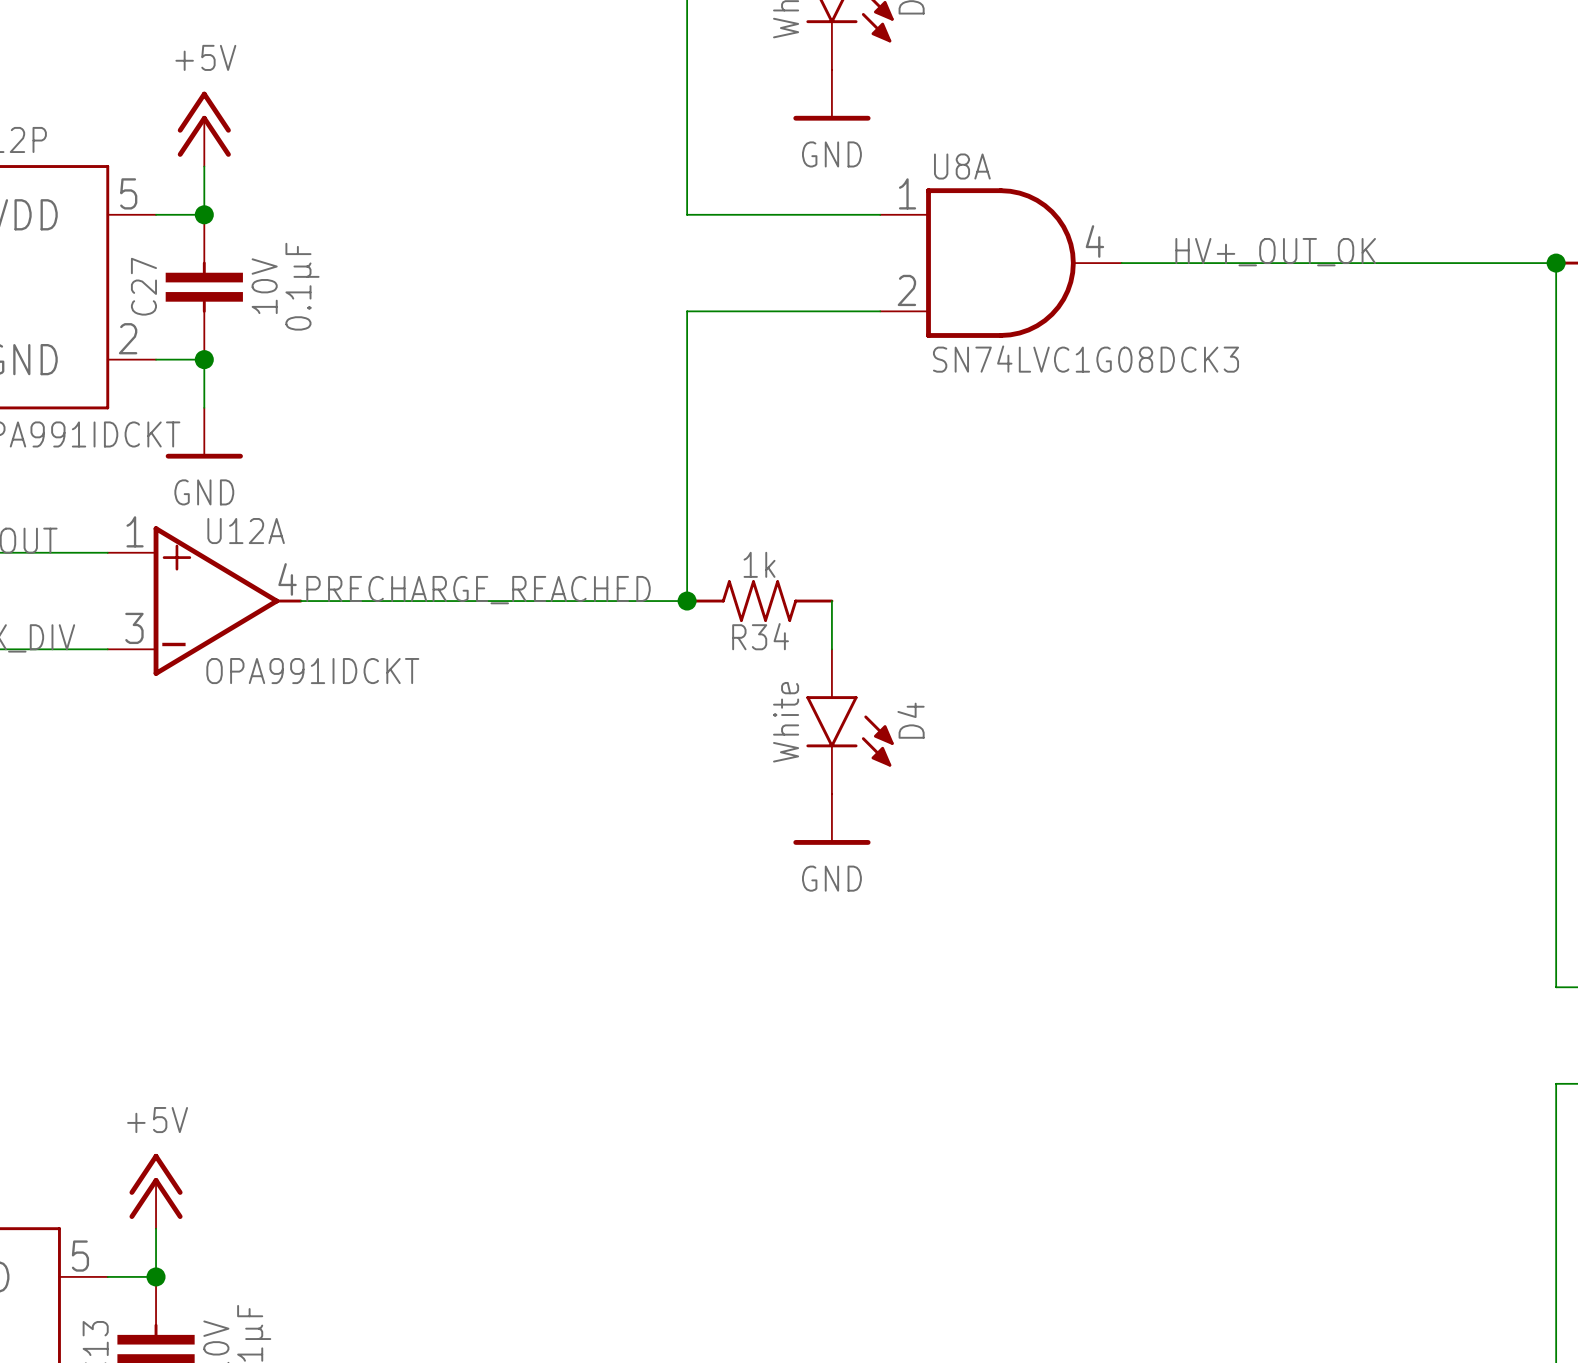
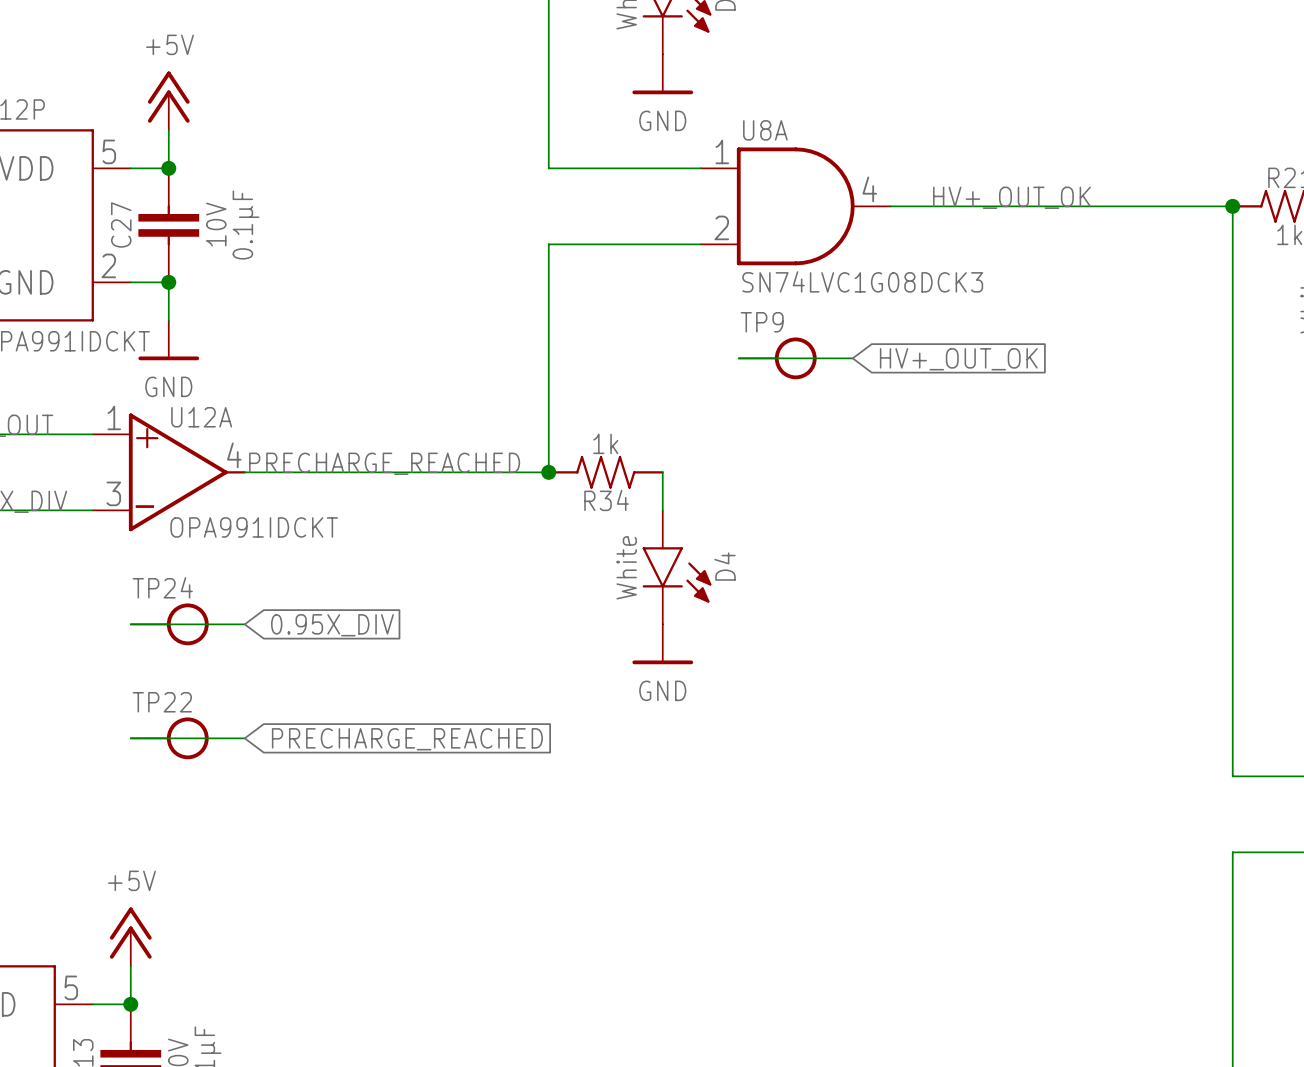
wire: none -> (738, 358) (852, 358)
TP9: none -> (777, 358)
global label: none -> HV+_OUT_OK (958, 359)
wire: none -> (130, 624) (244, 624)
TP24: none -> (169, 624)
global label: none -> 0.95X_DIV (332, 625)
wire: none -> (130, 738) (244, 738)
TP22: none -> (169, 738)
global label: none -> PRECHARGE_REACHED (407, 739)

